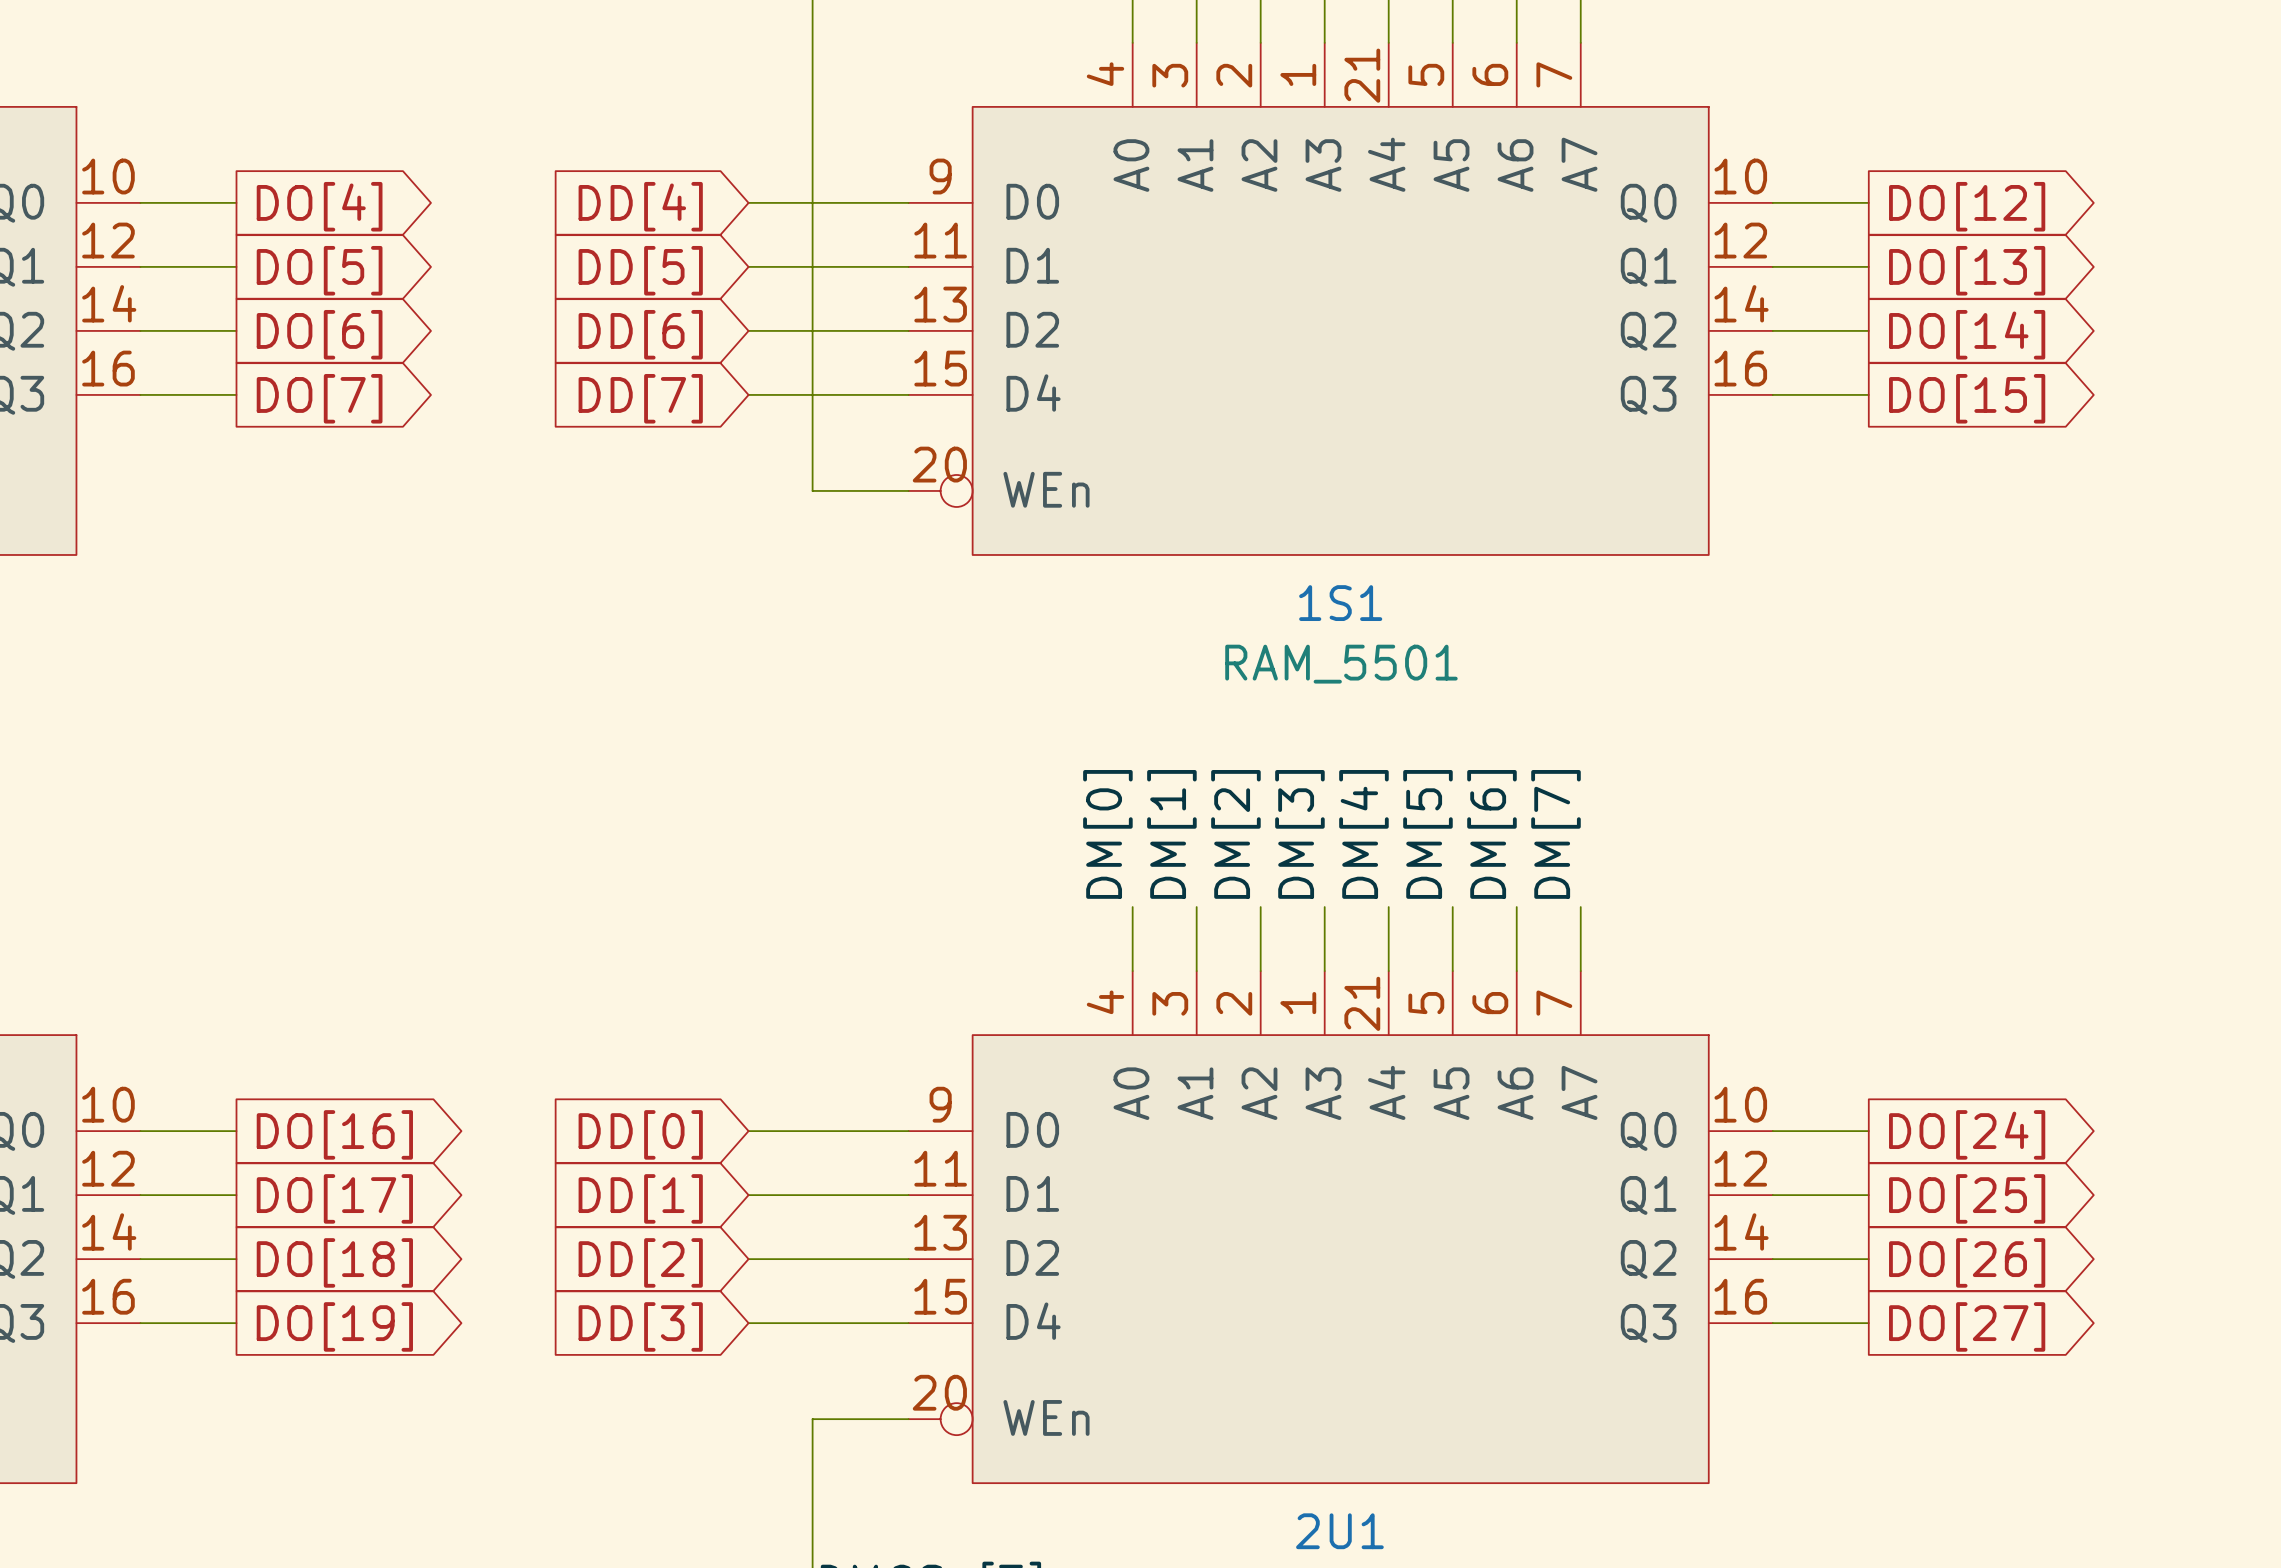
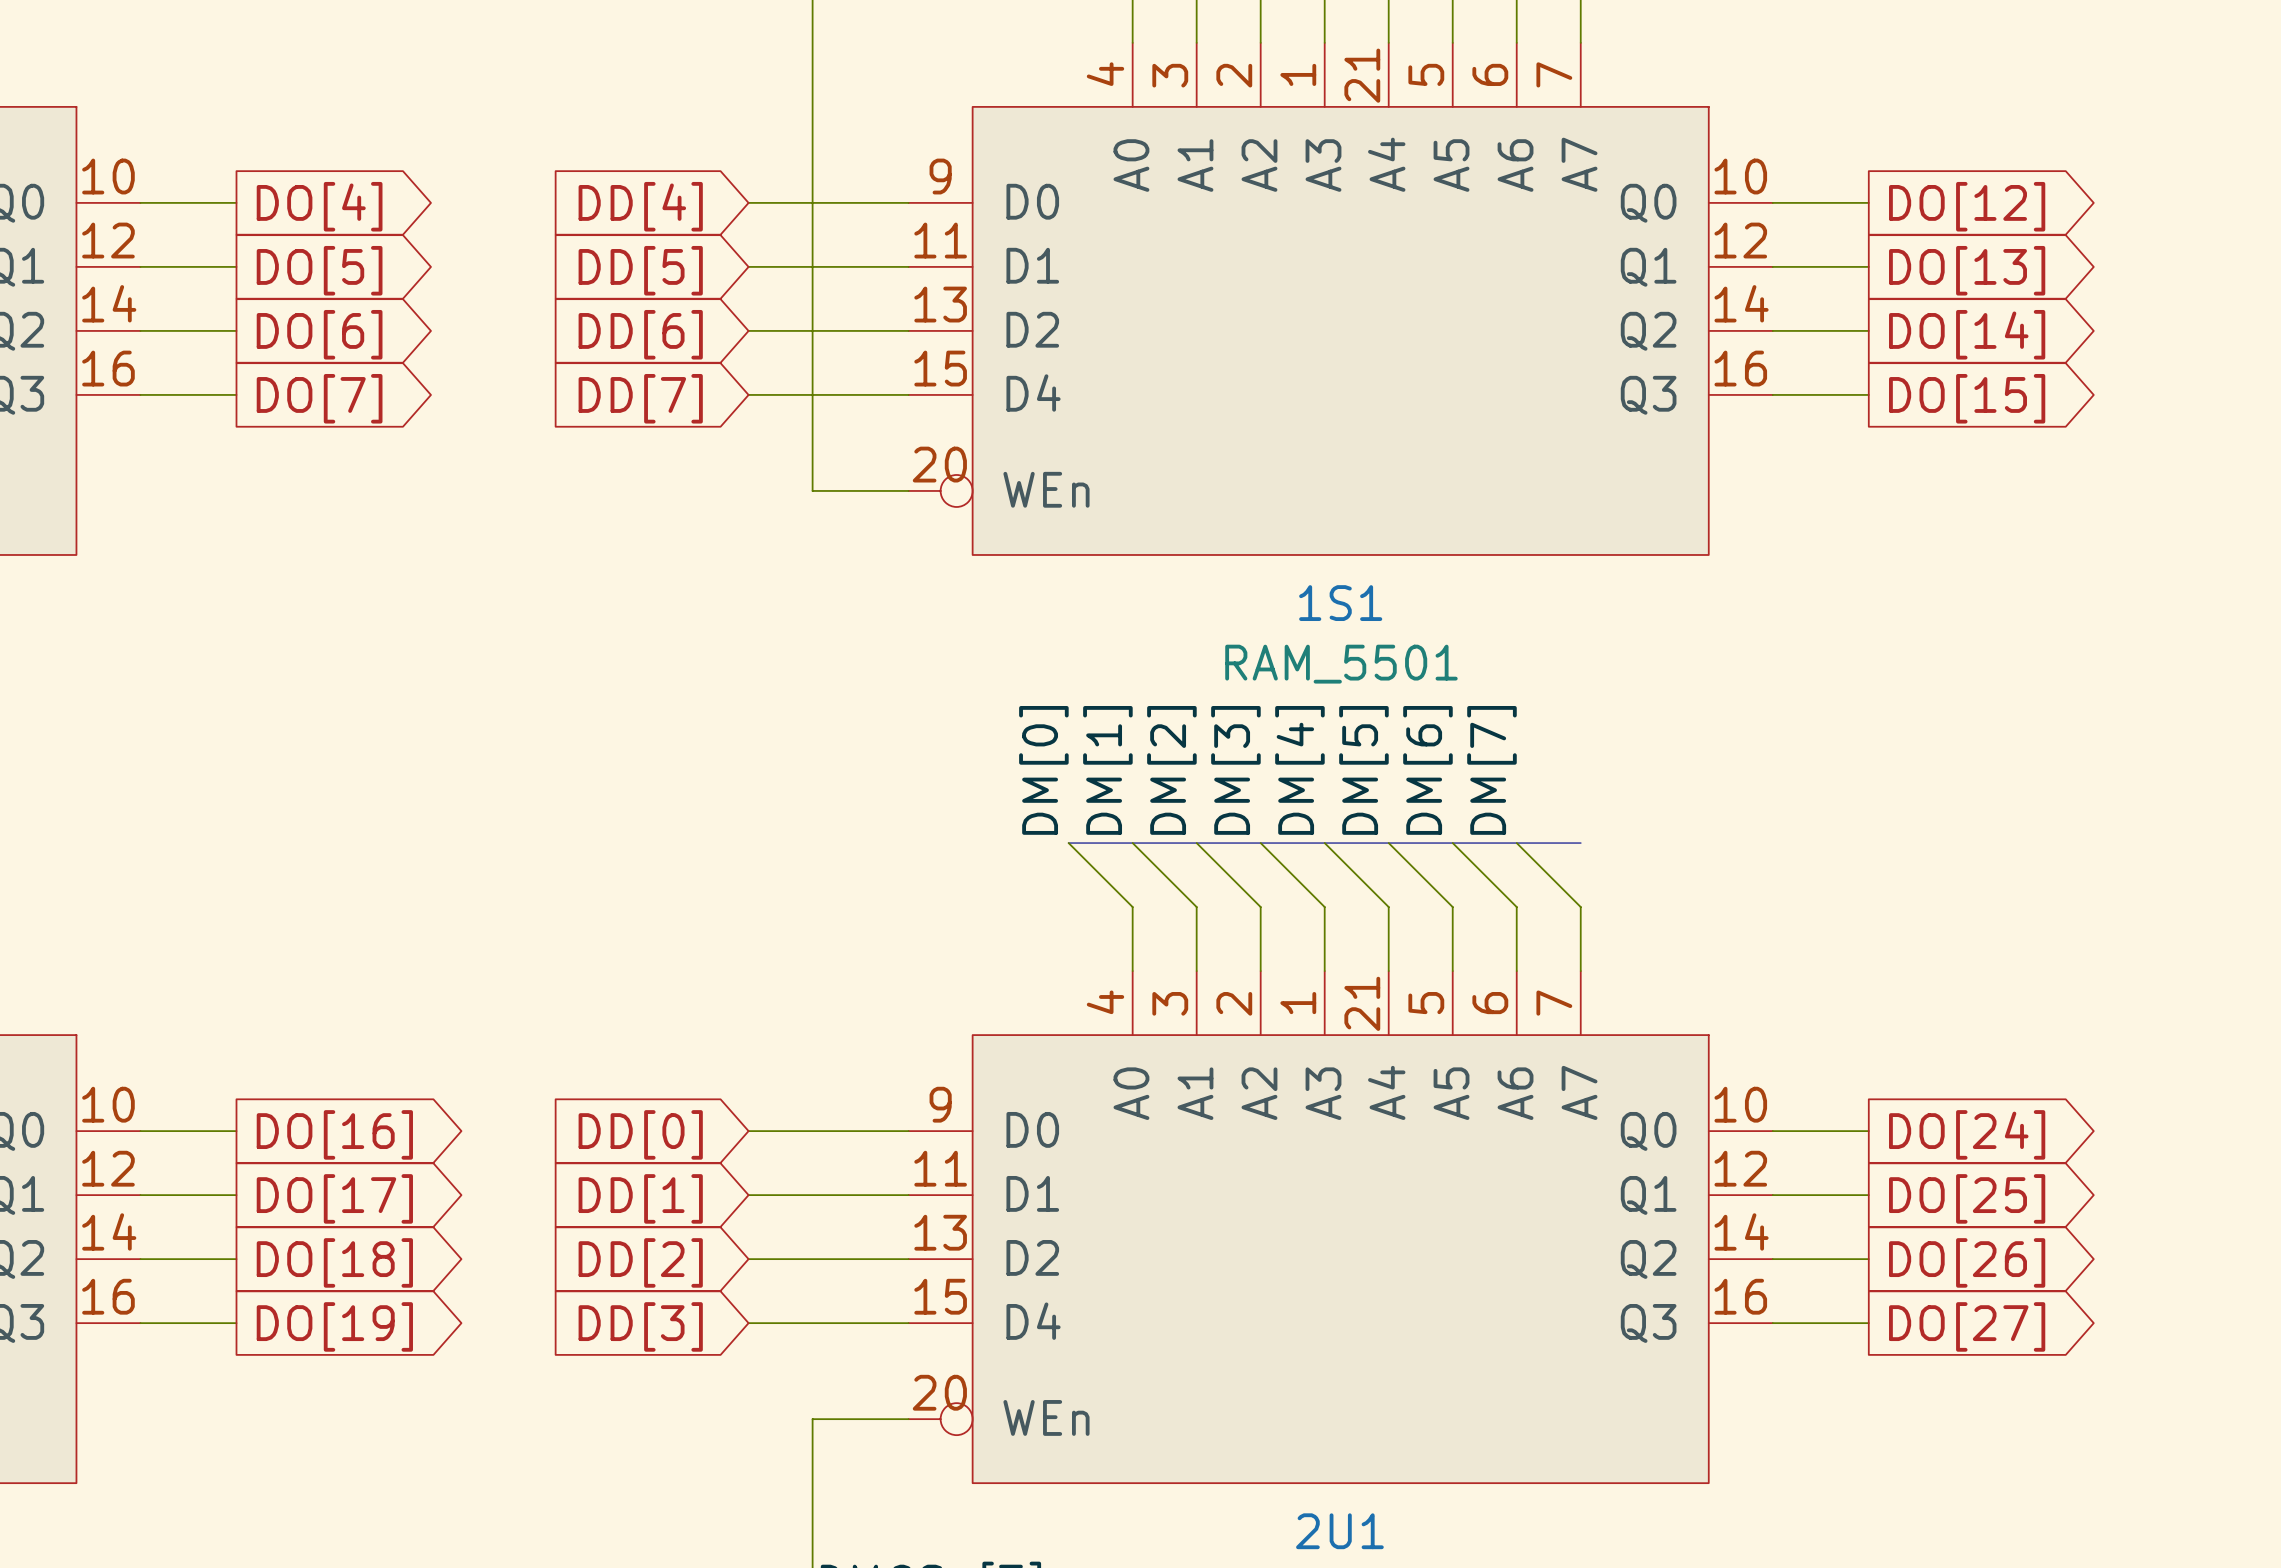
label position: DM[0] (1107, 834) -> DM[0] (1043, 770)
label position: DM[1] (1171, 834) -> DM[1] (1107, 770)
label position: DM[2] (1235, 834) -> DM[2] (1171, 770)
label position: DM[3] (1299, 834) -> DM[3] (1235, 770)
label position: DM[4] (1363, 834) -> DM[4] (1299, 770)
label position: DM[5] (1427, 834) -> DM[5] (1363, 770)
label position: DM[6] (1491, 834) -> DM[6] (1427, 770)
label position: DM[7] (1555, 834) -> DM[7] (1491, 770)
wire: none -> (1068, 843) (1132, 907)
bus: none -> (1068, 843) (1580, 843)
wire: none -> (1132, 843) (1196, 907)
wire: none -> (1196, 843) (1260, 907)
wire: none -> (1260, 843) (1324, 907)
wire: none -> (1324, 843) (1388, 907)
wire: none -> (1388, 843) (1452, 907)
wire: none -> (1452, 843) (1516, 907)
wire: none -> (1516, 843) (1580, 907)

